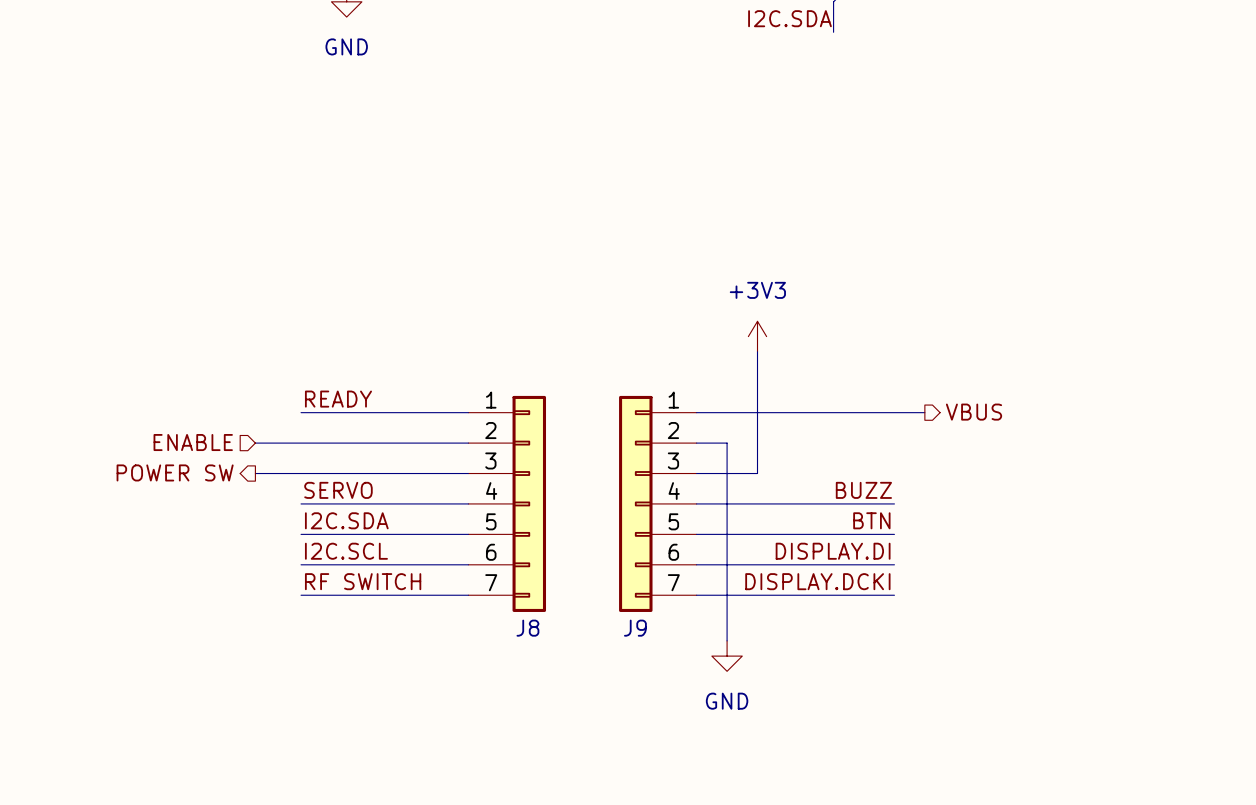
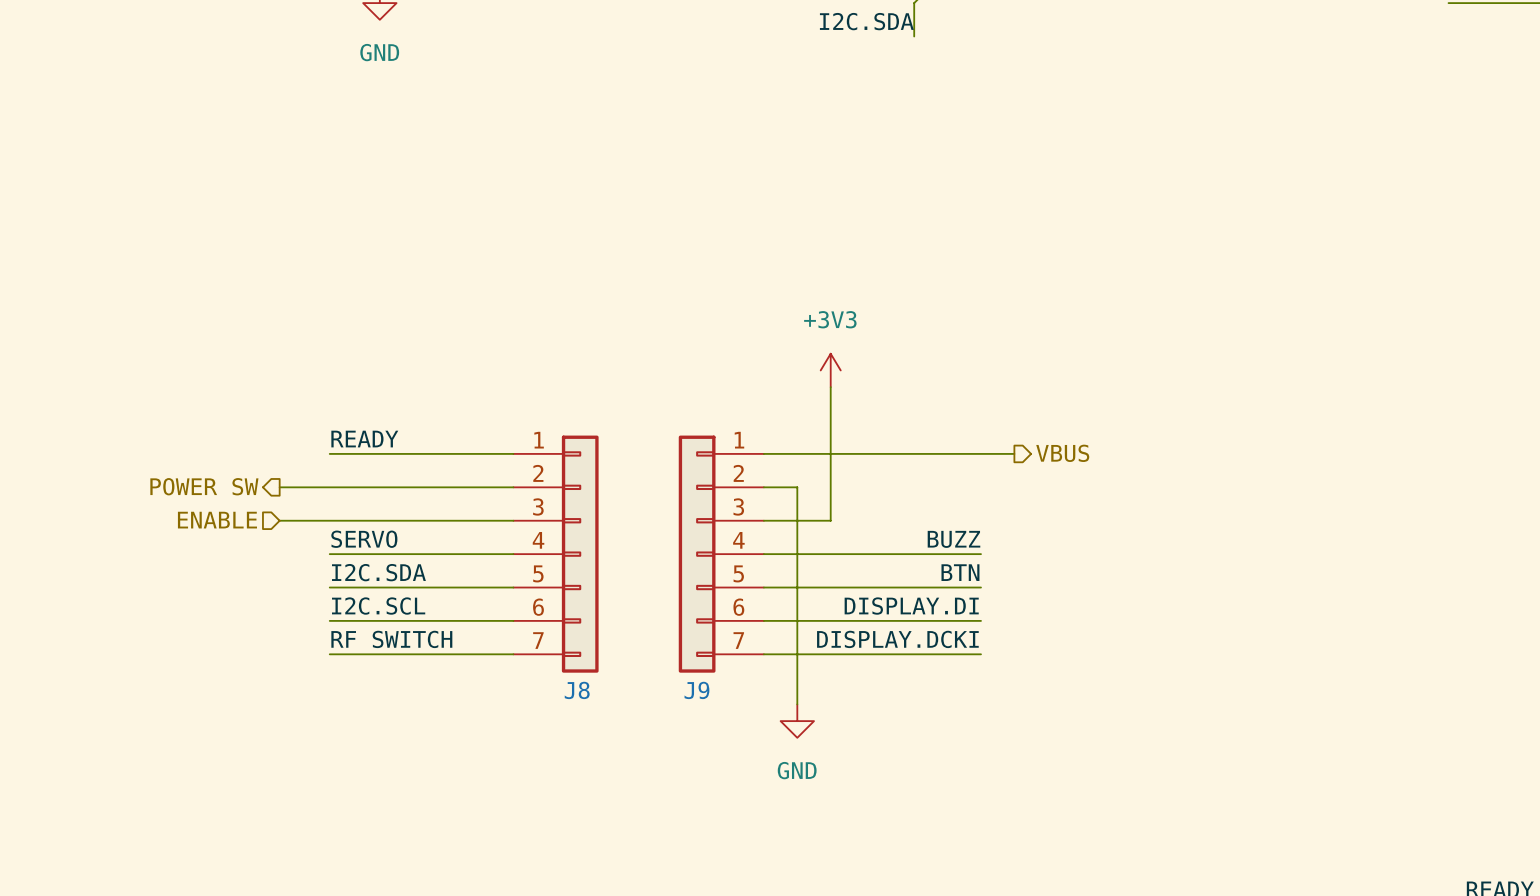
hierarchical label shape: input (193, 442) -> output (204, 486)
hierarchical label: ENABLE (193, 442) -> POWER SW (204, 486)
hierarchical label shape: output (175, 472) -> input (217, 520)
hierarchical label: POWER SW (175, 472) -> ENABLE (217, 520)

